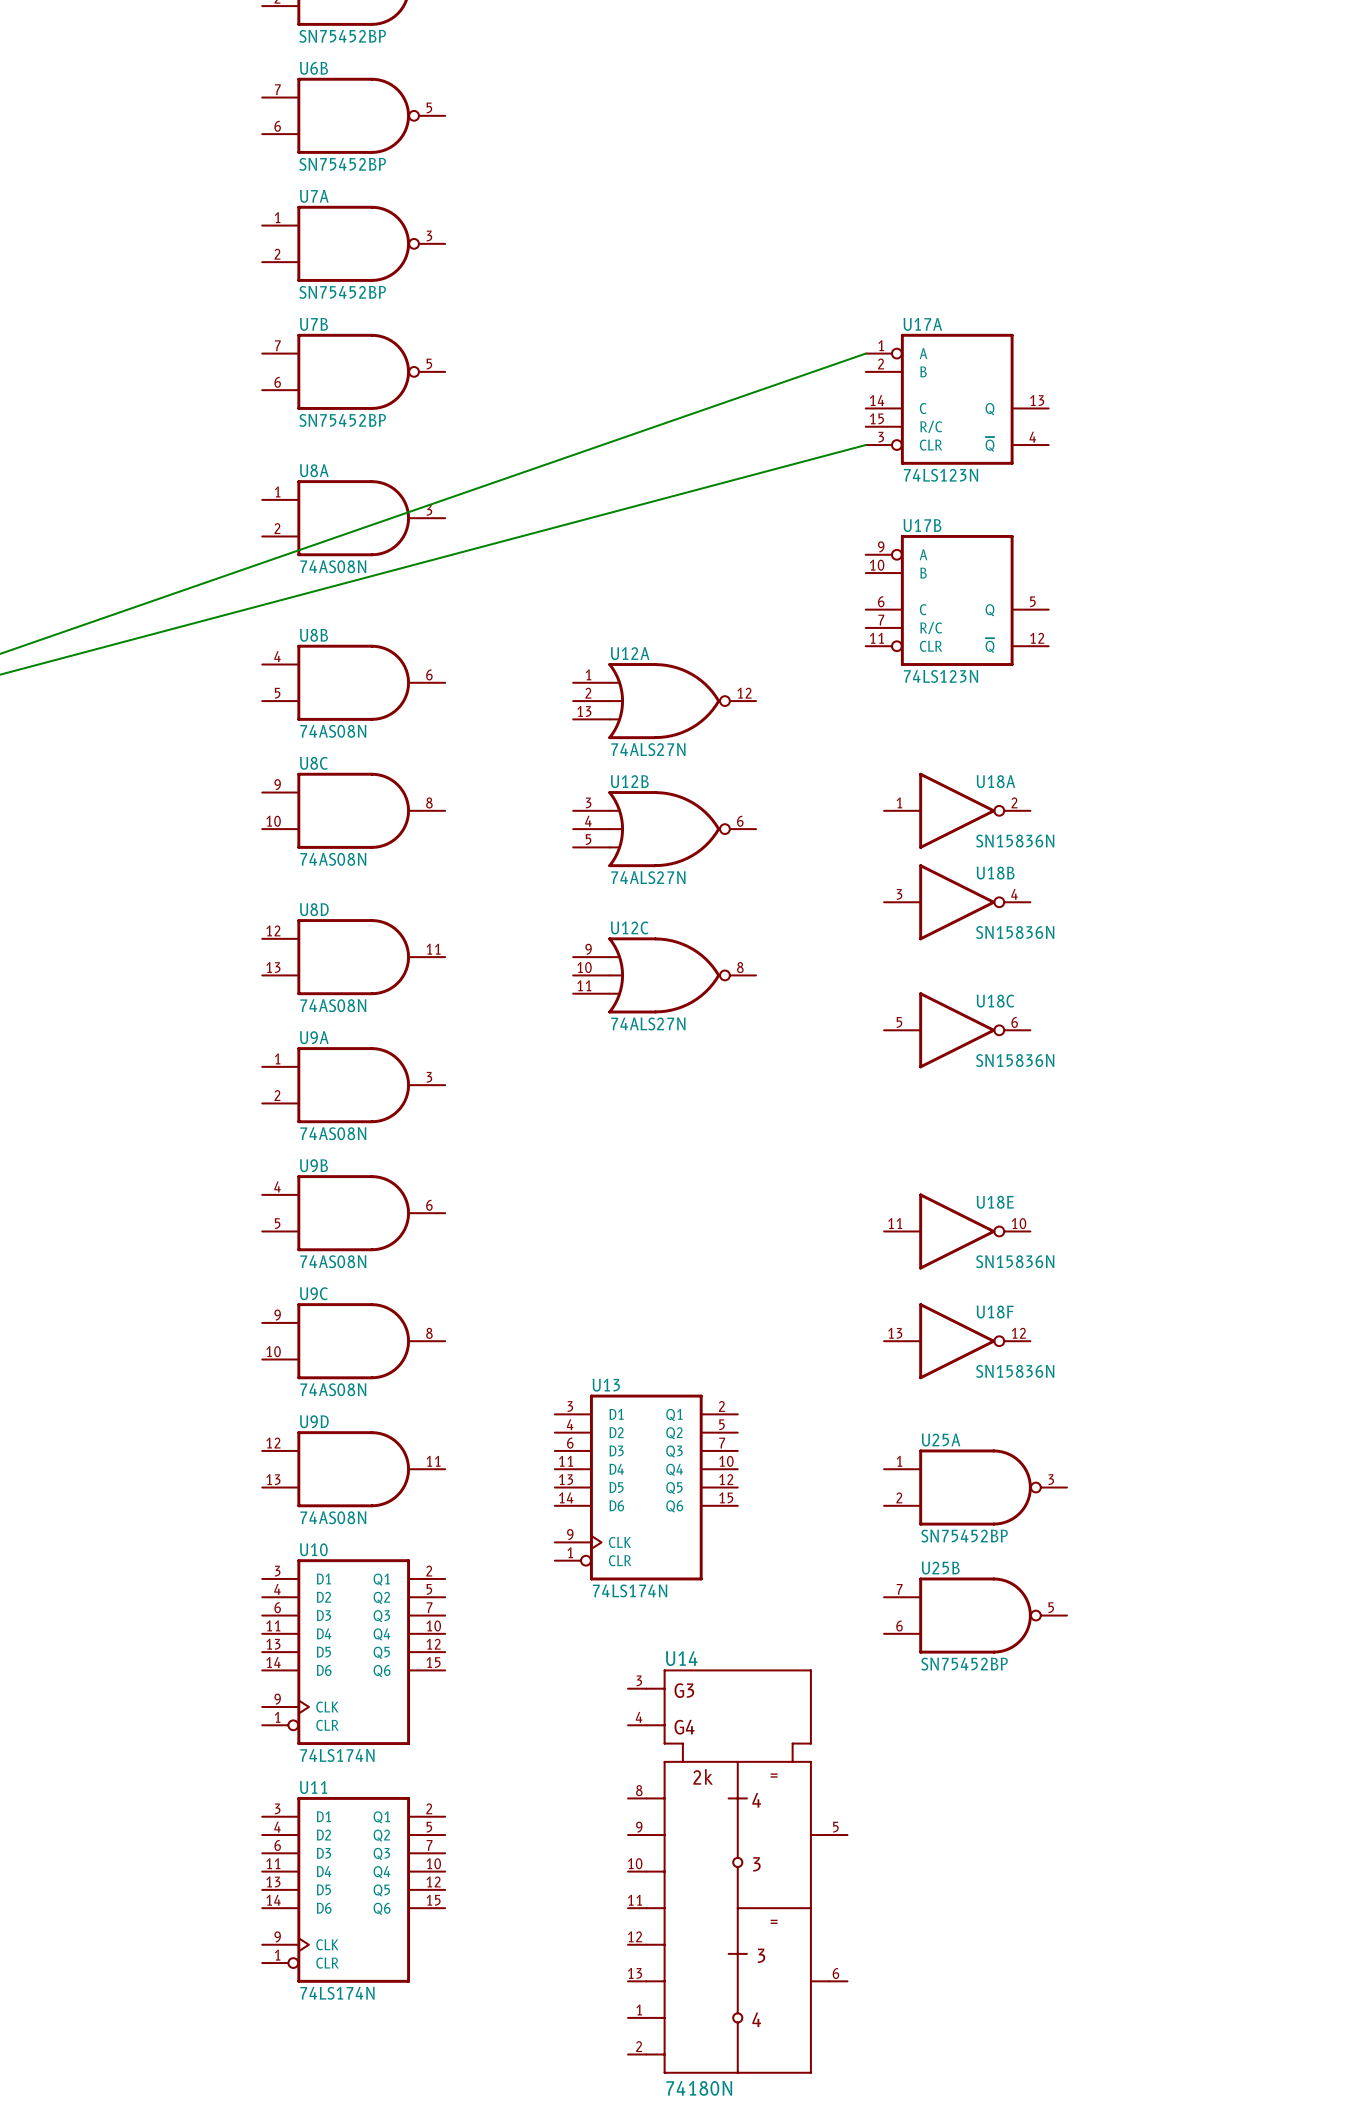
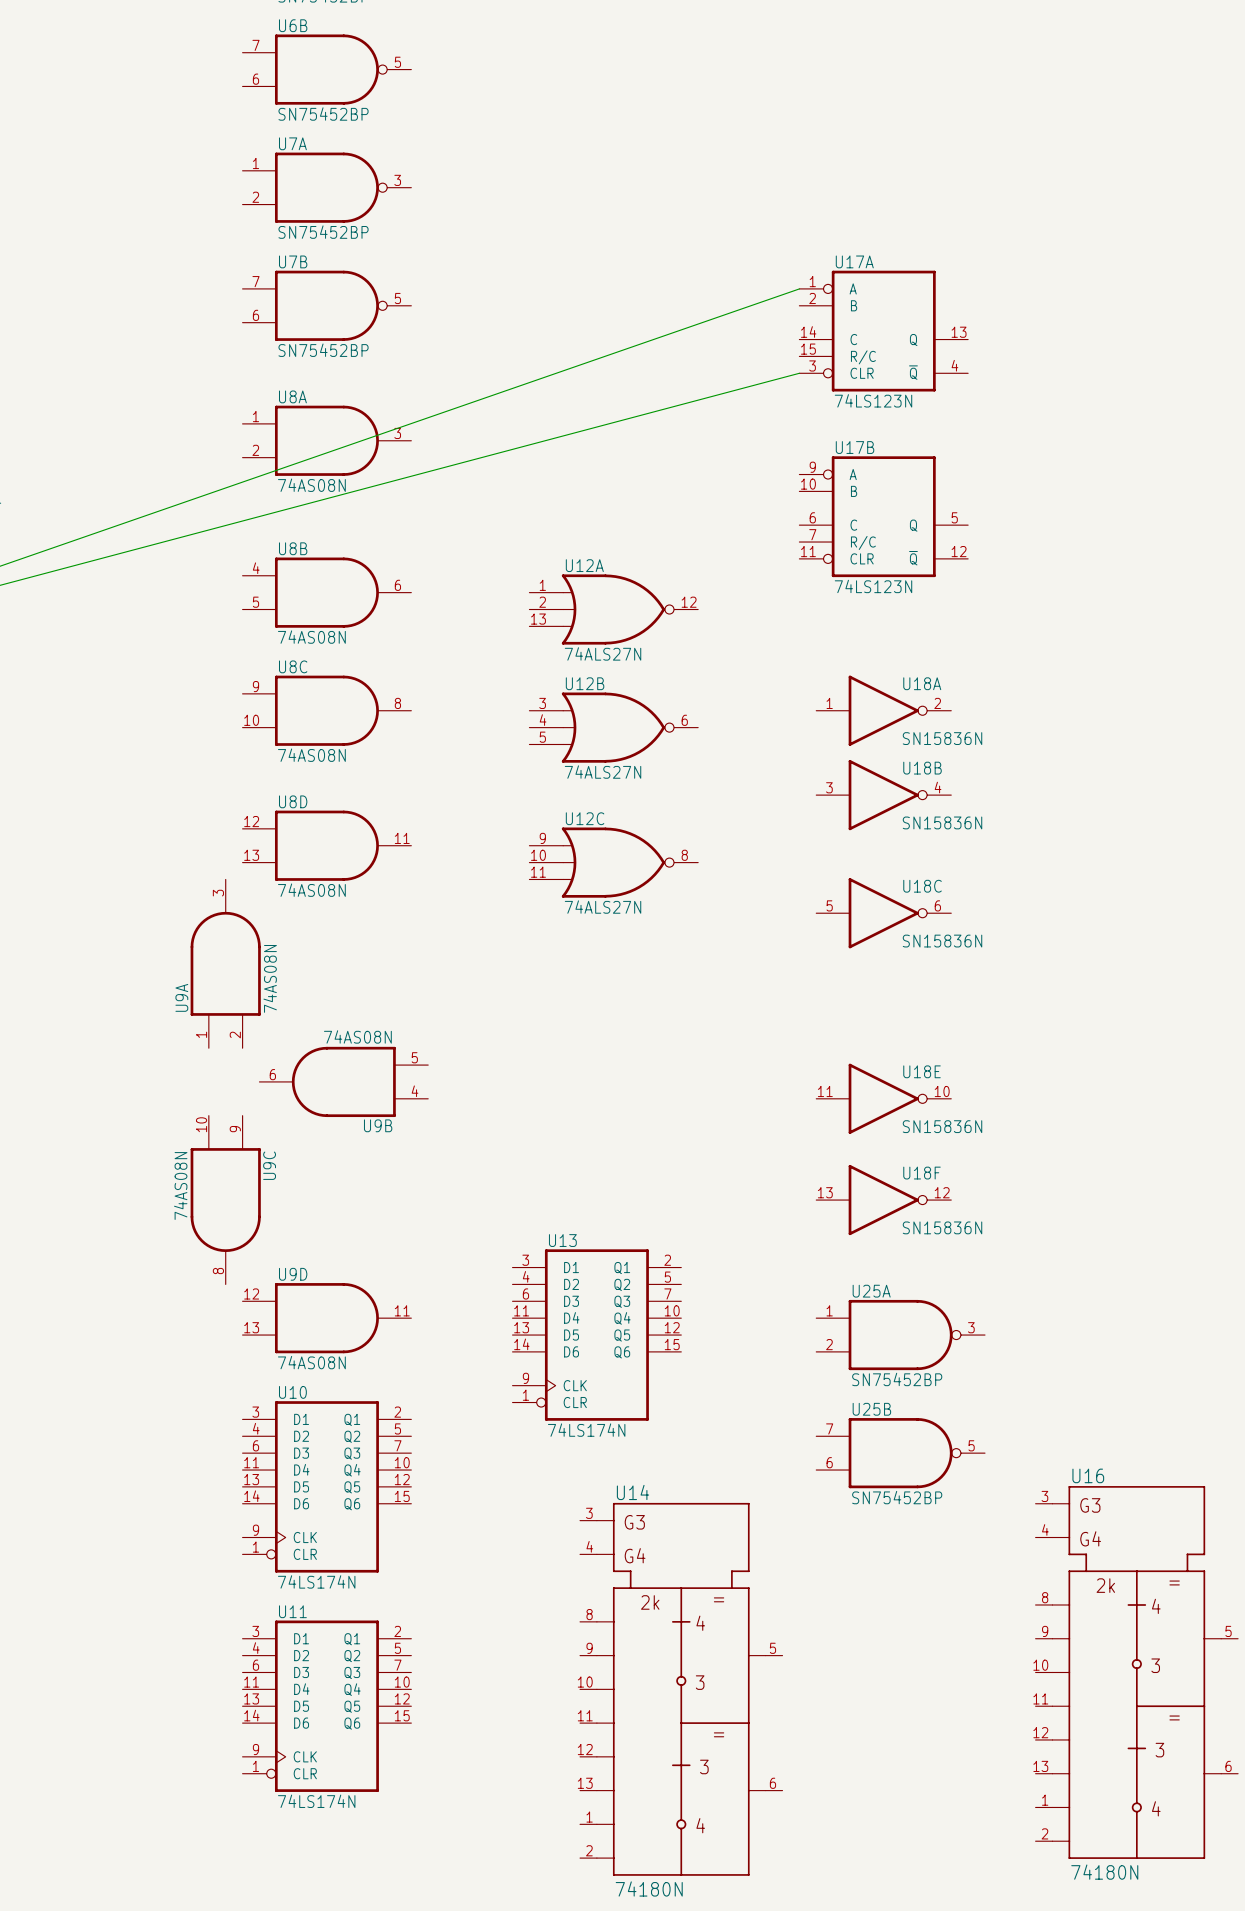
U9A rotation: 0° (353, 1085) -> 90° counterclockwise (225, 963)
U9B rotation: 0° (353, 1213) -> 180° (343, 1081)
U9C rotation: 0° (353, 1341) -> 90° clockwise (225, 1200)
U16: none -> 74180N (1136, 1672)

